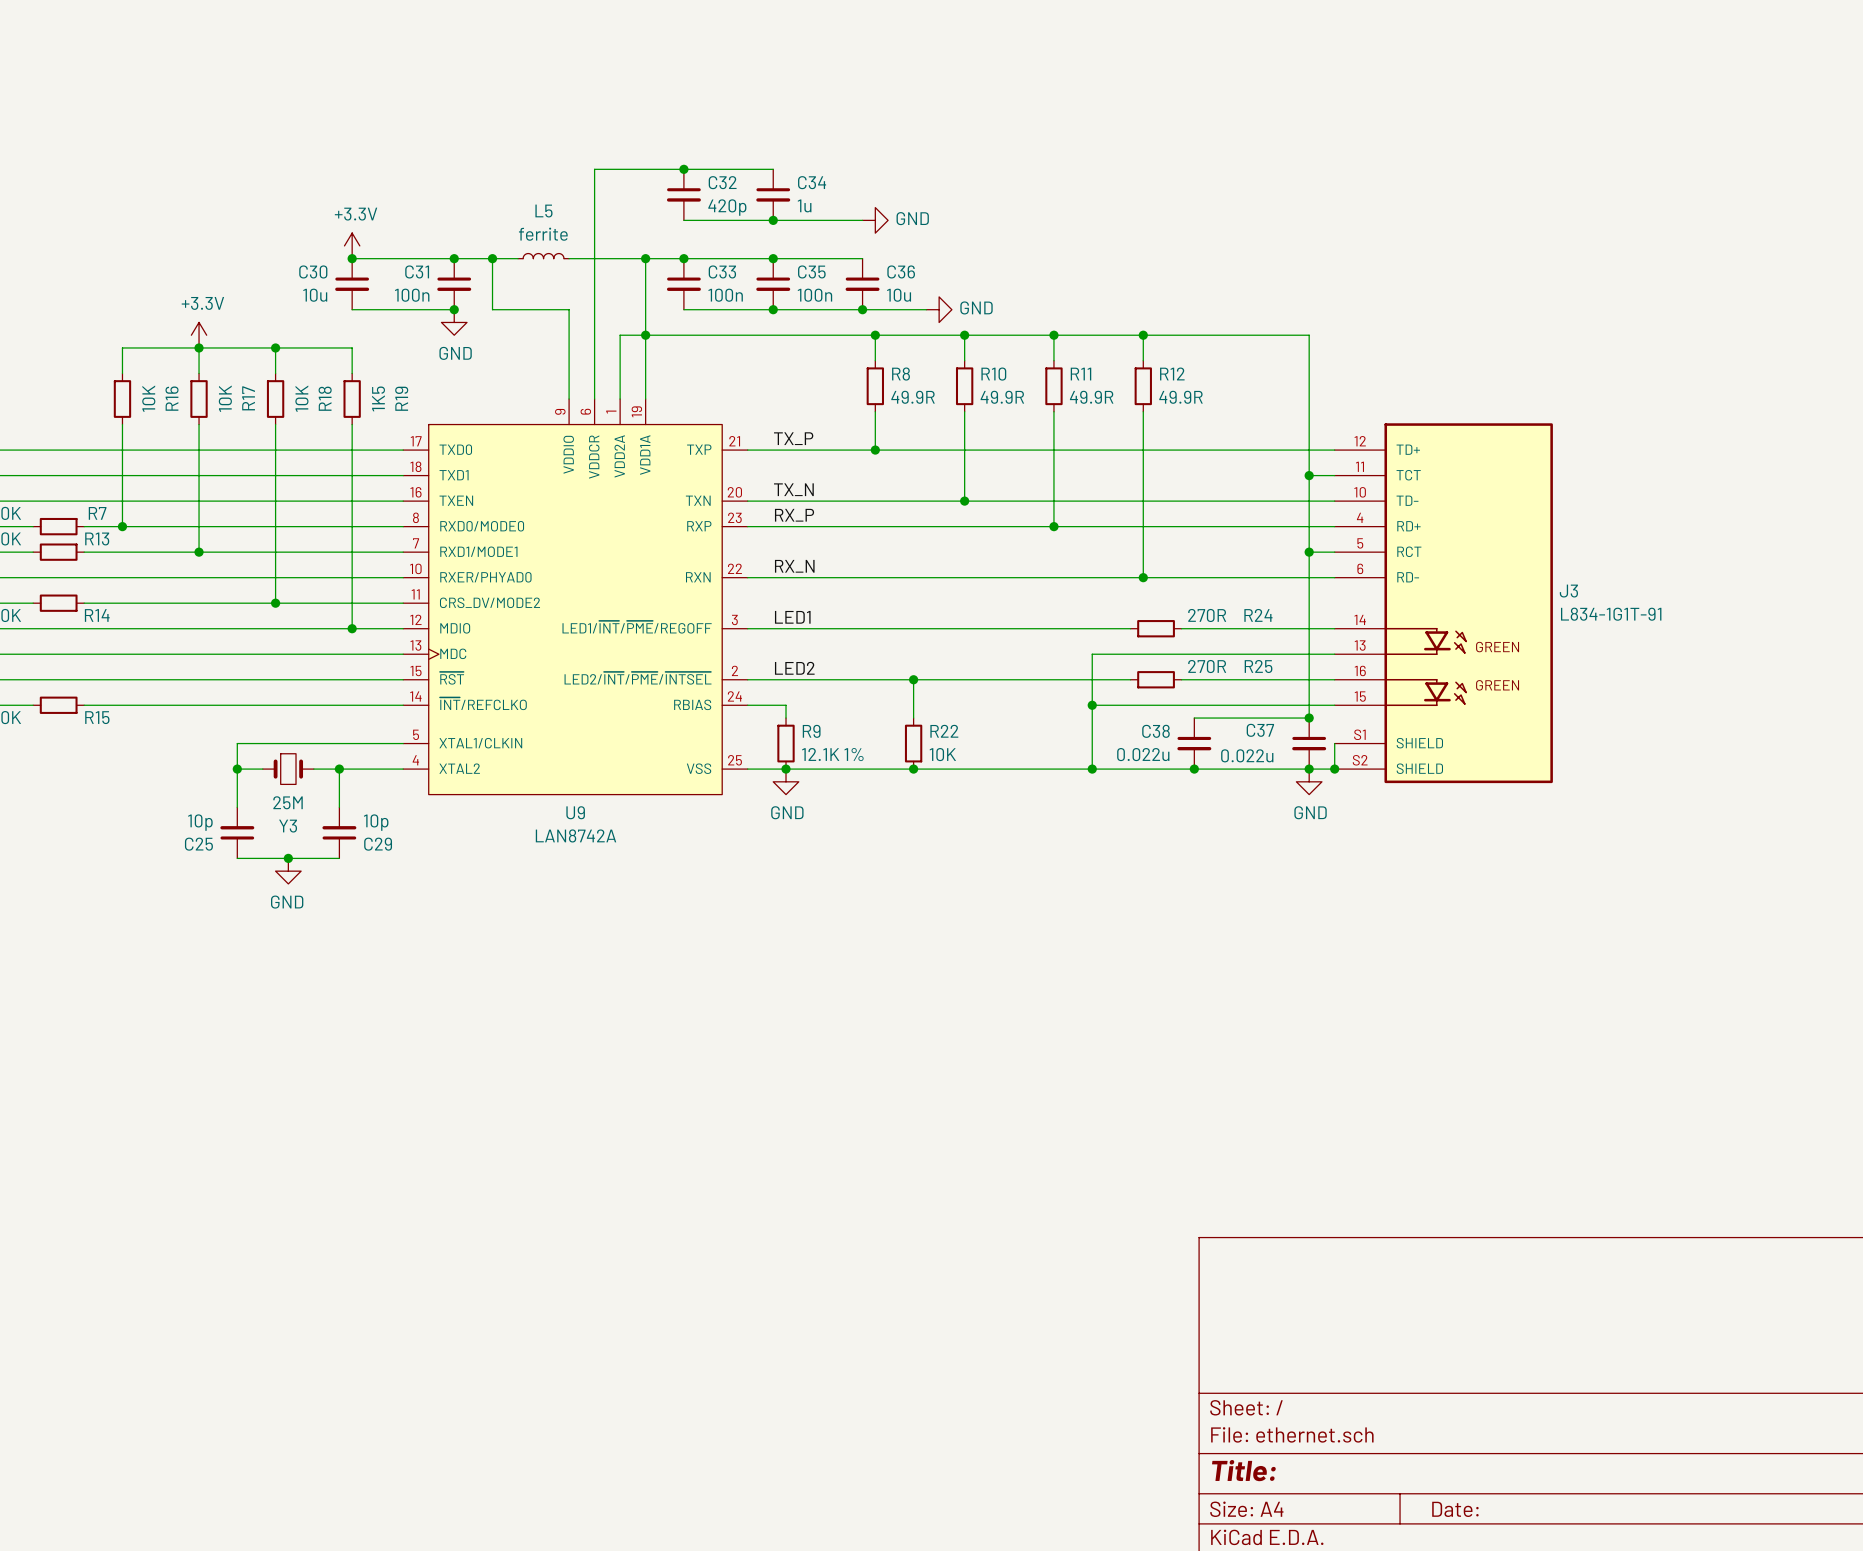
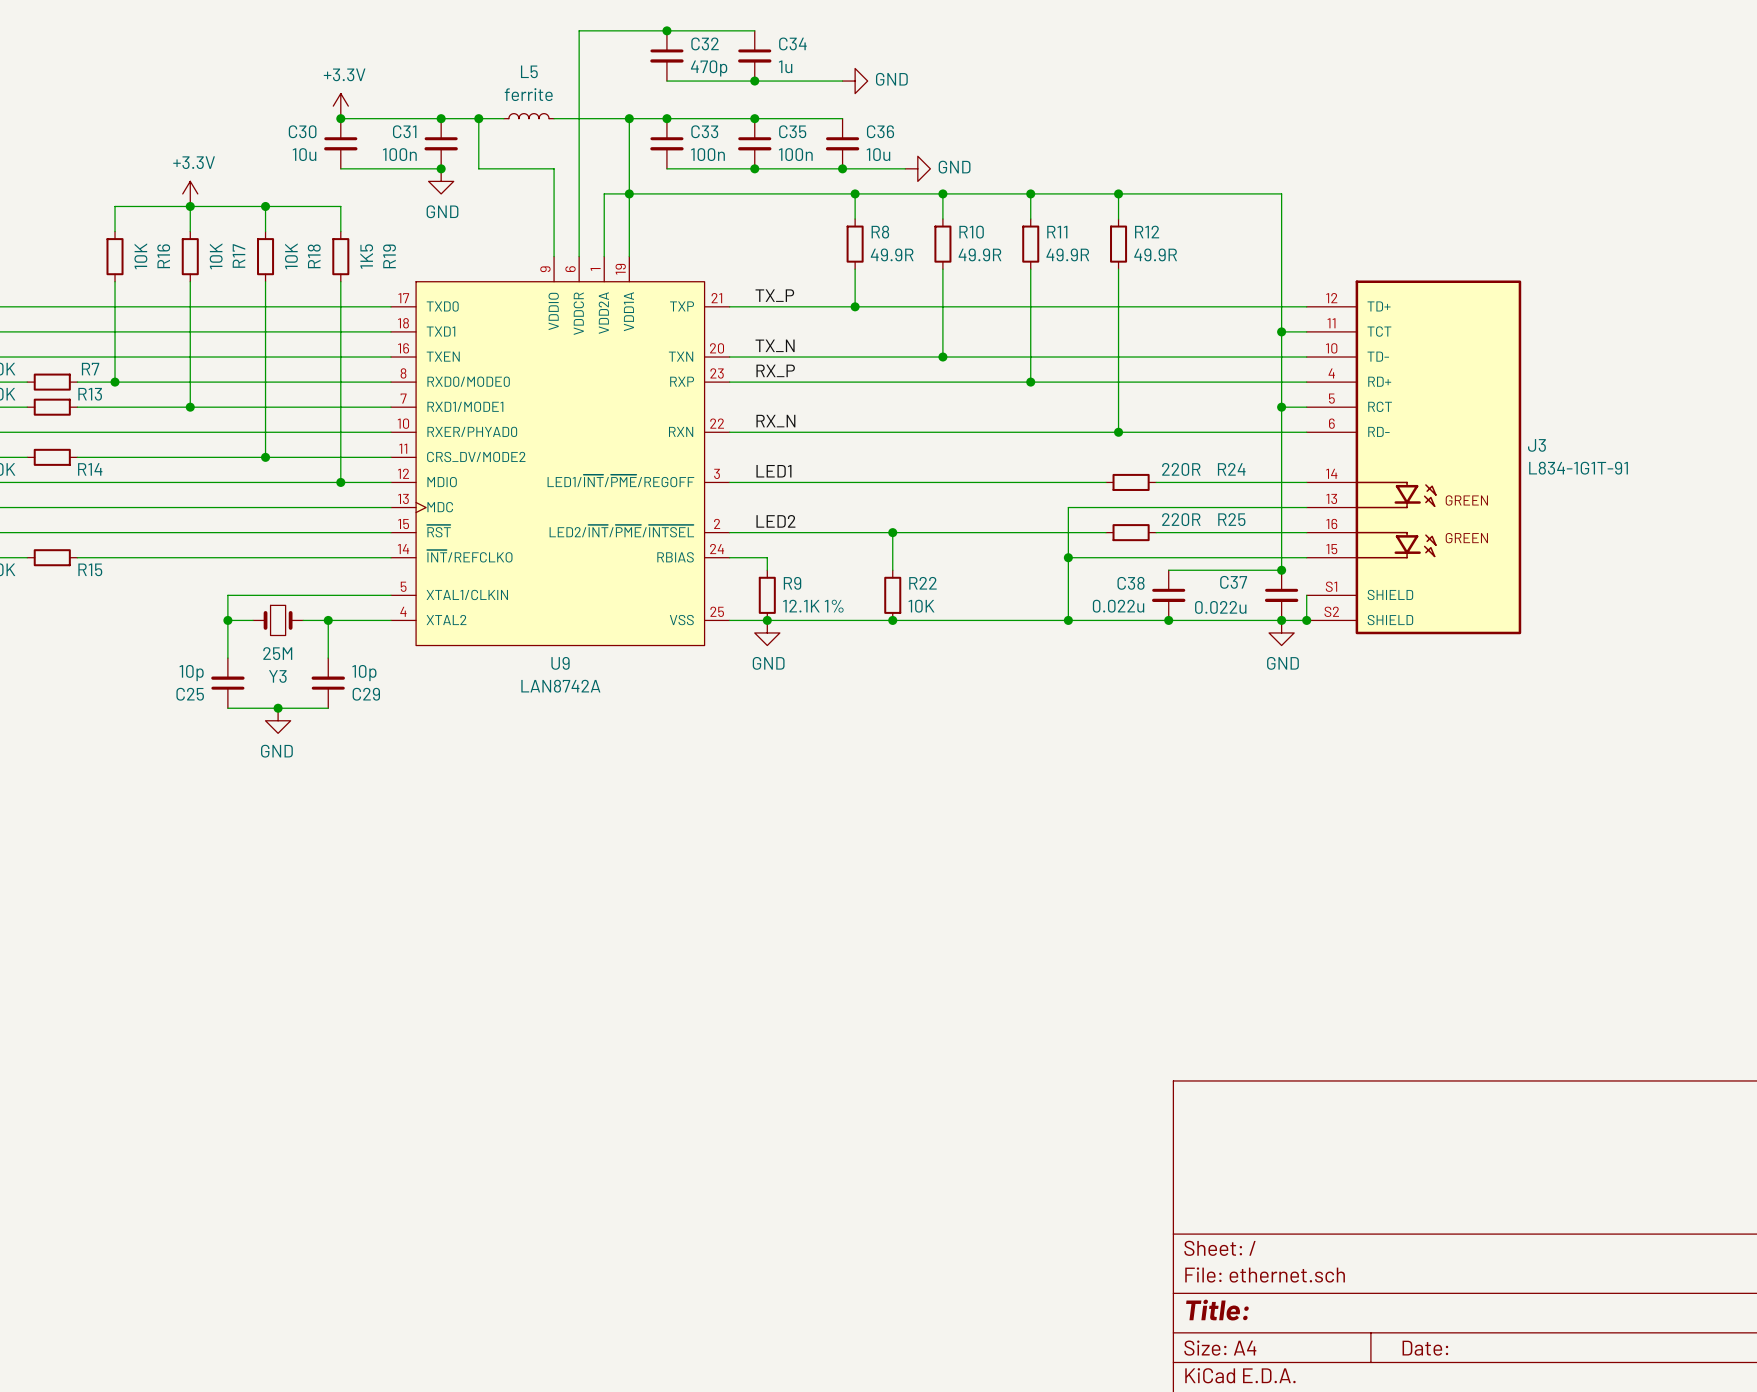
C32 value: 420p (727, 207) -> 470p (709, 68)
R24 value: 270R (1207, 615) -> 220R (1181, 469)
R25 value: 270R (1207, 666) -> 220R (1181, 519)

